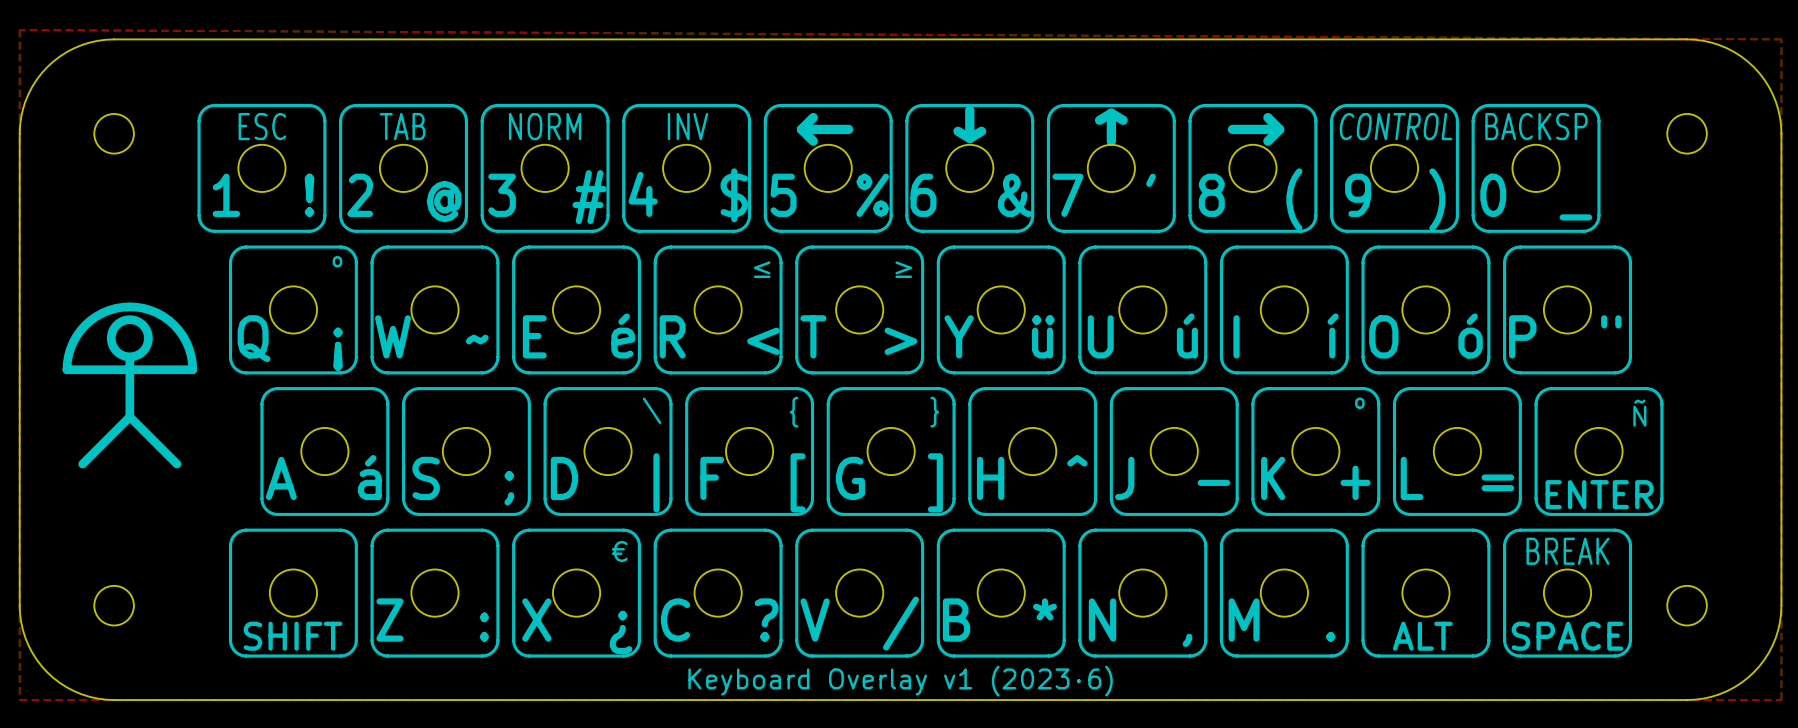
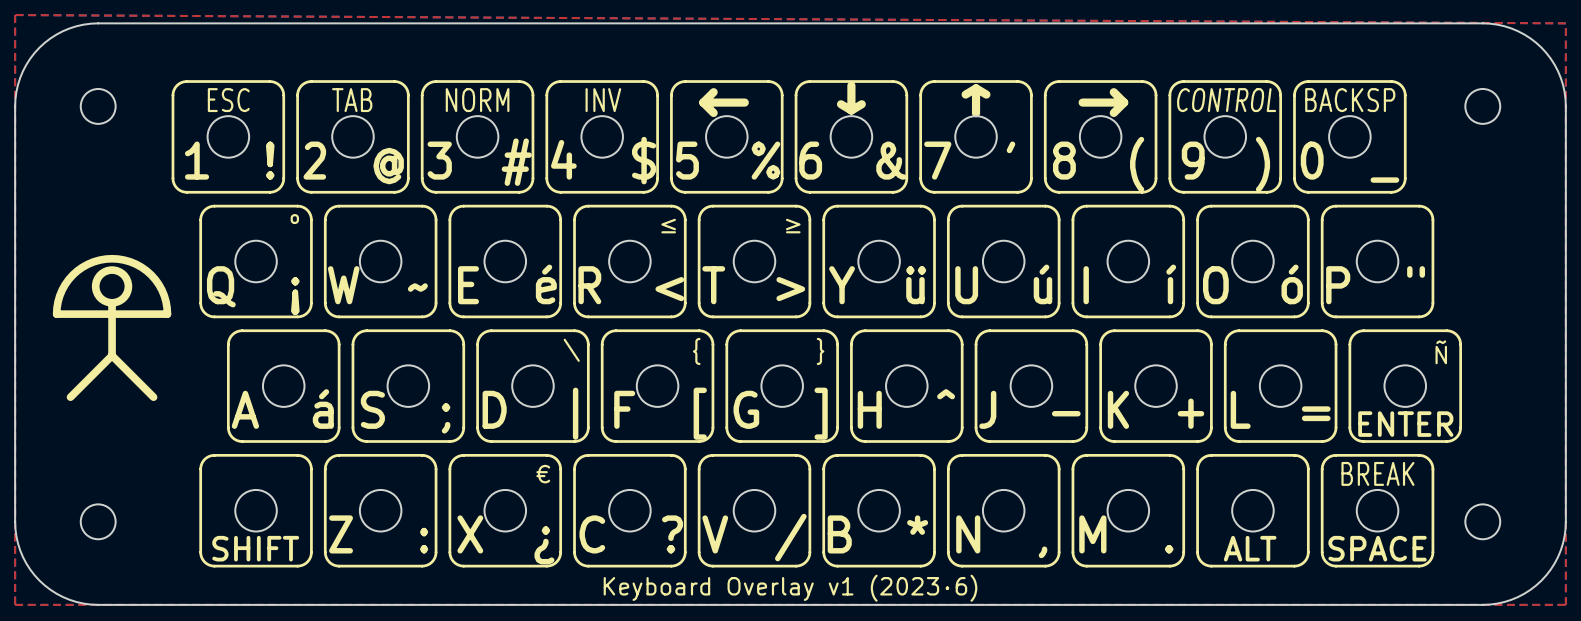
text: º (1359, 403) -> none

